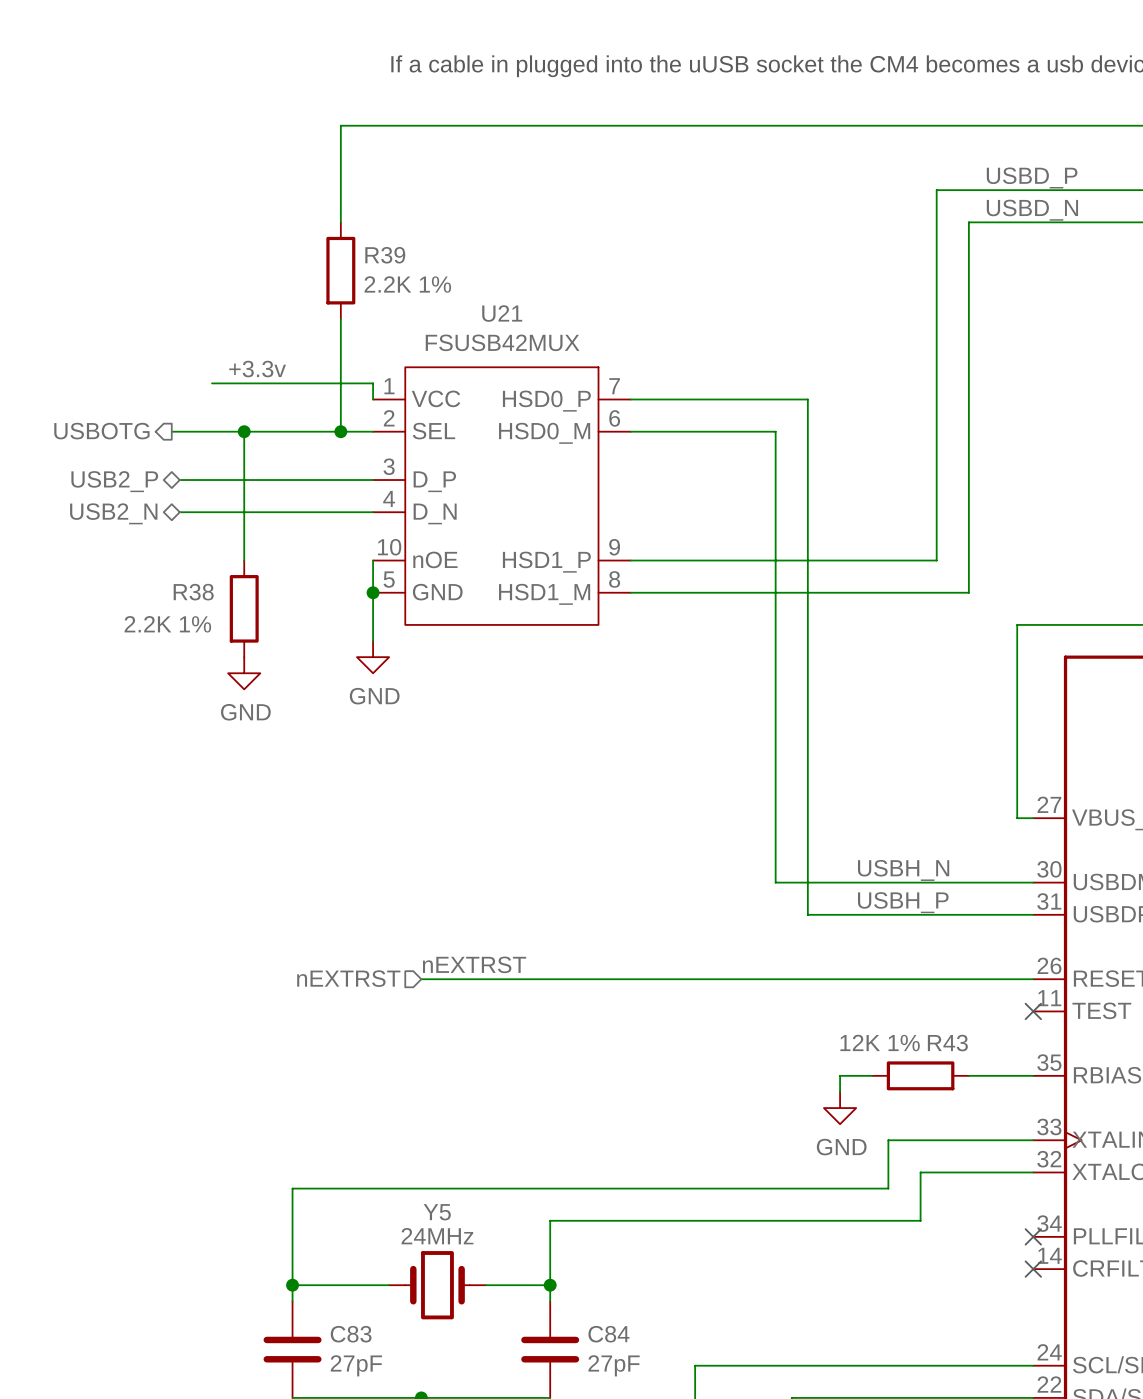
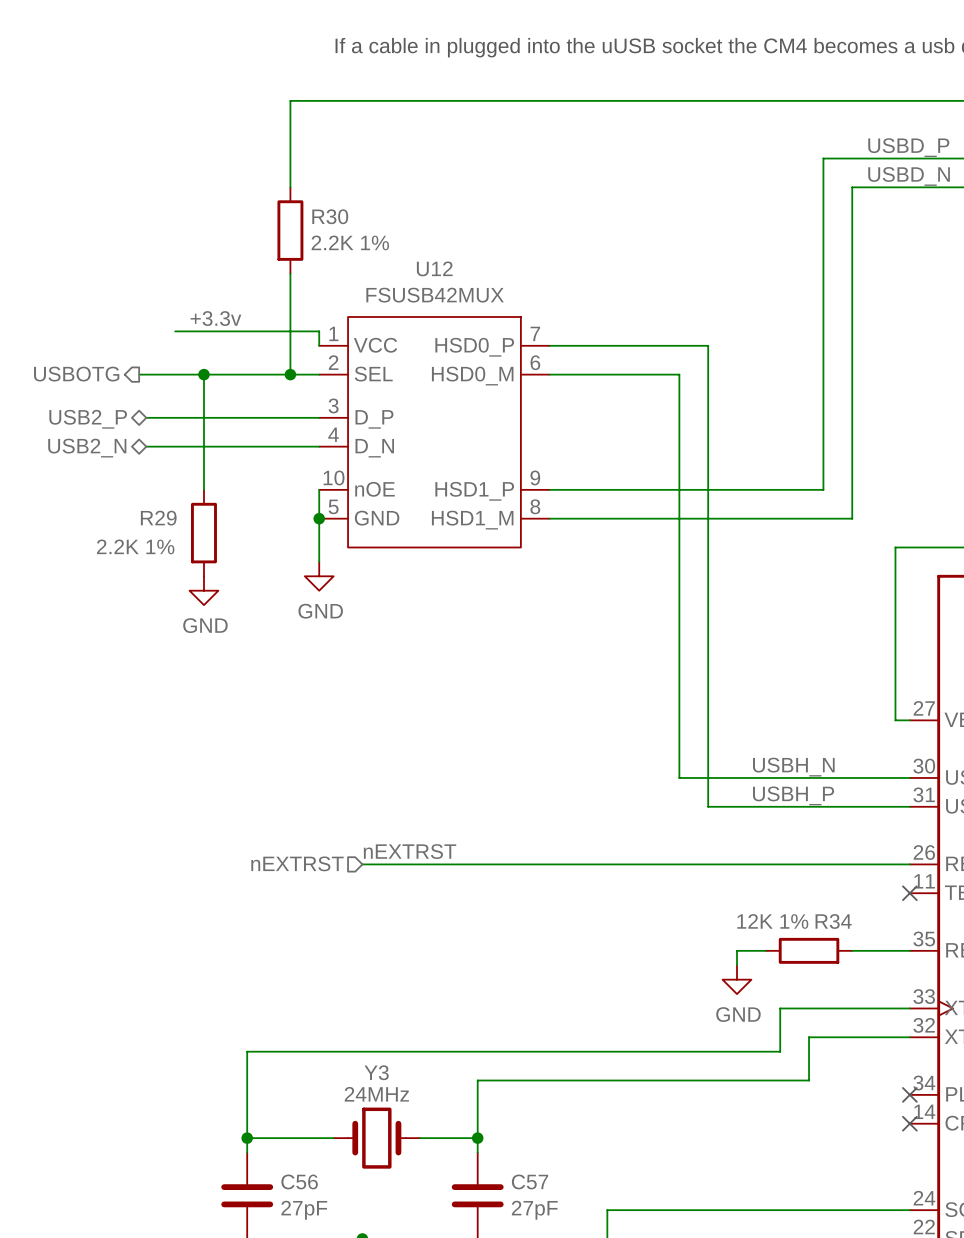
R39 name: R39 (385, 255) -> R30 (330, 216)
U21 name: U21 (502, 313) -> U12 (434, 268)
R38 name: R38 (193, 592) -> R29 (158, 518)
R43 name: R43 (947, 1043) -> R34 (833, 921)
Y5 name: Y5 (437, 1212) -> Y3 (376, 1072)
C83 name: C83 (351, 1334) -> C56 (299, 1181)
C84 name: C84 (608, 1334) -> C57 (530, 1181)

